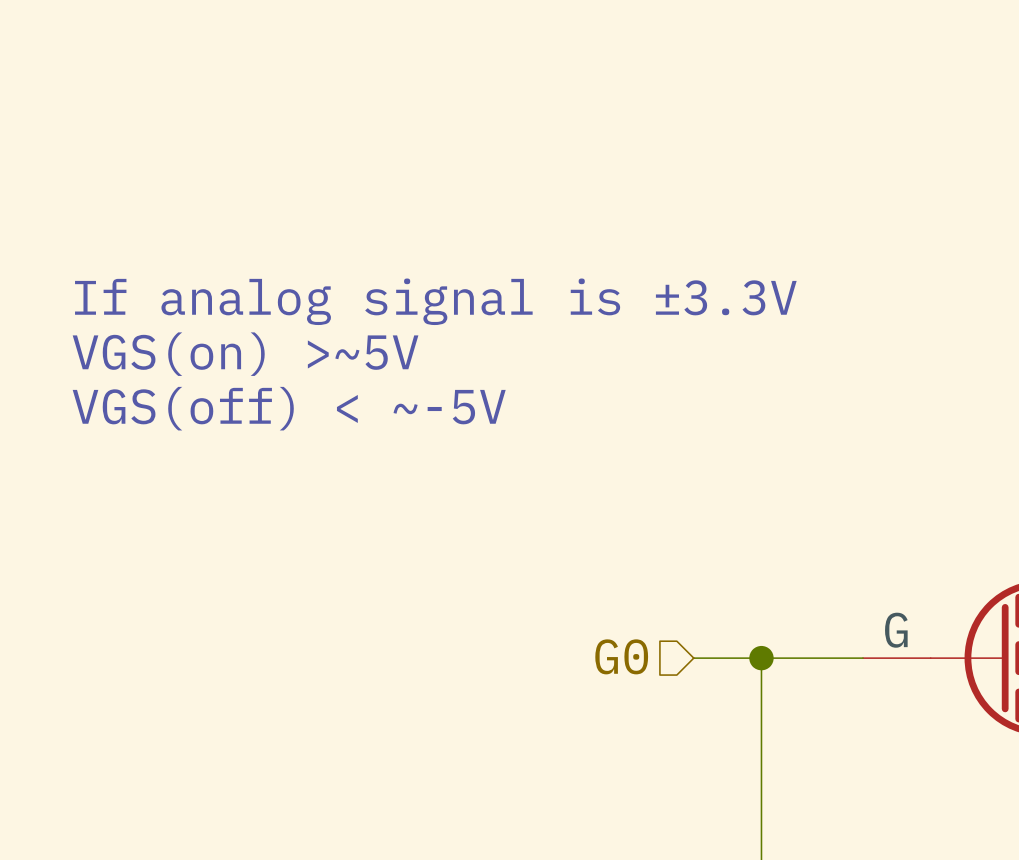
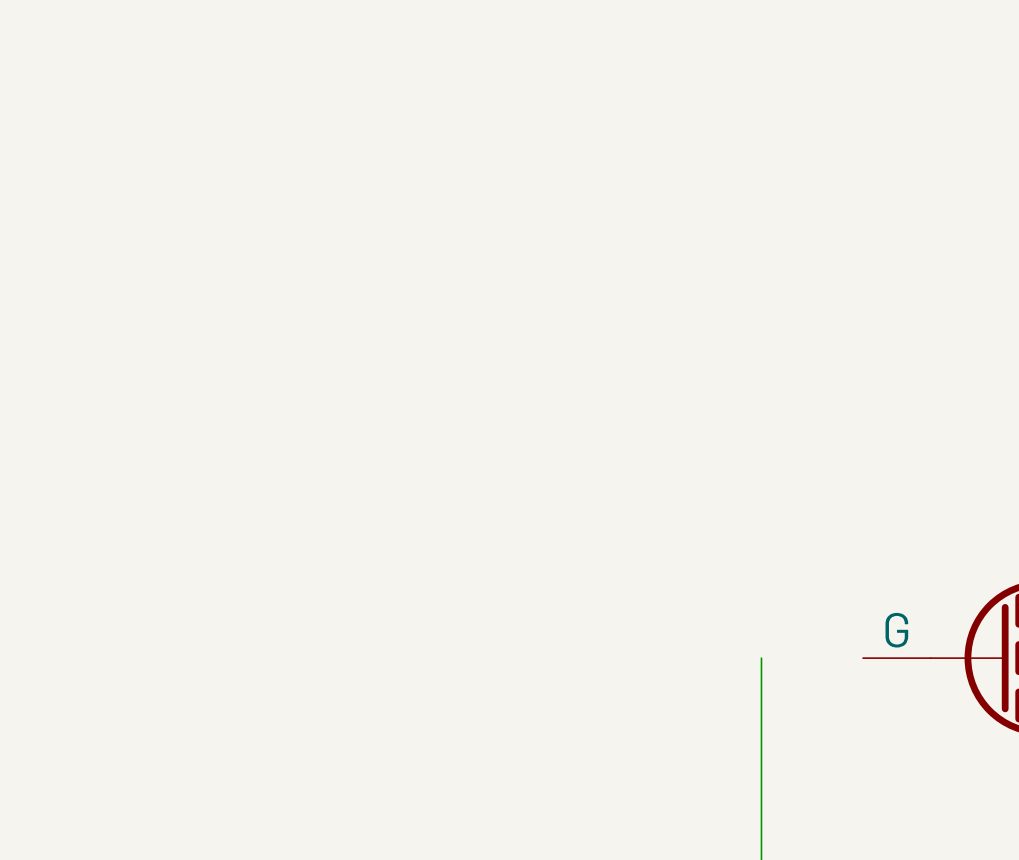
text: If analog signal is ±3.3V (435, 301) -> none
text: VGS(on) >~5V (245, 354) -> none
text: VGS(off) < ~-5V (289, 408) -> none
hierarchical label: G0 (621, 656) -> none
wire: (693, 658) (863, 658) -> none
junction: (761, 658) -> none

